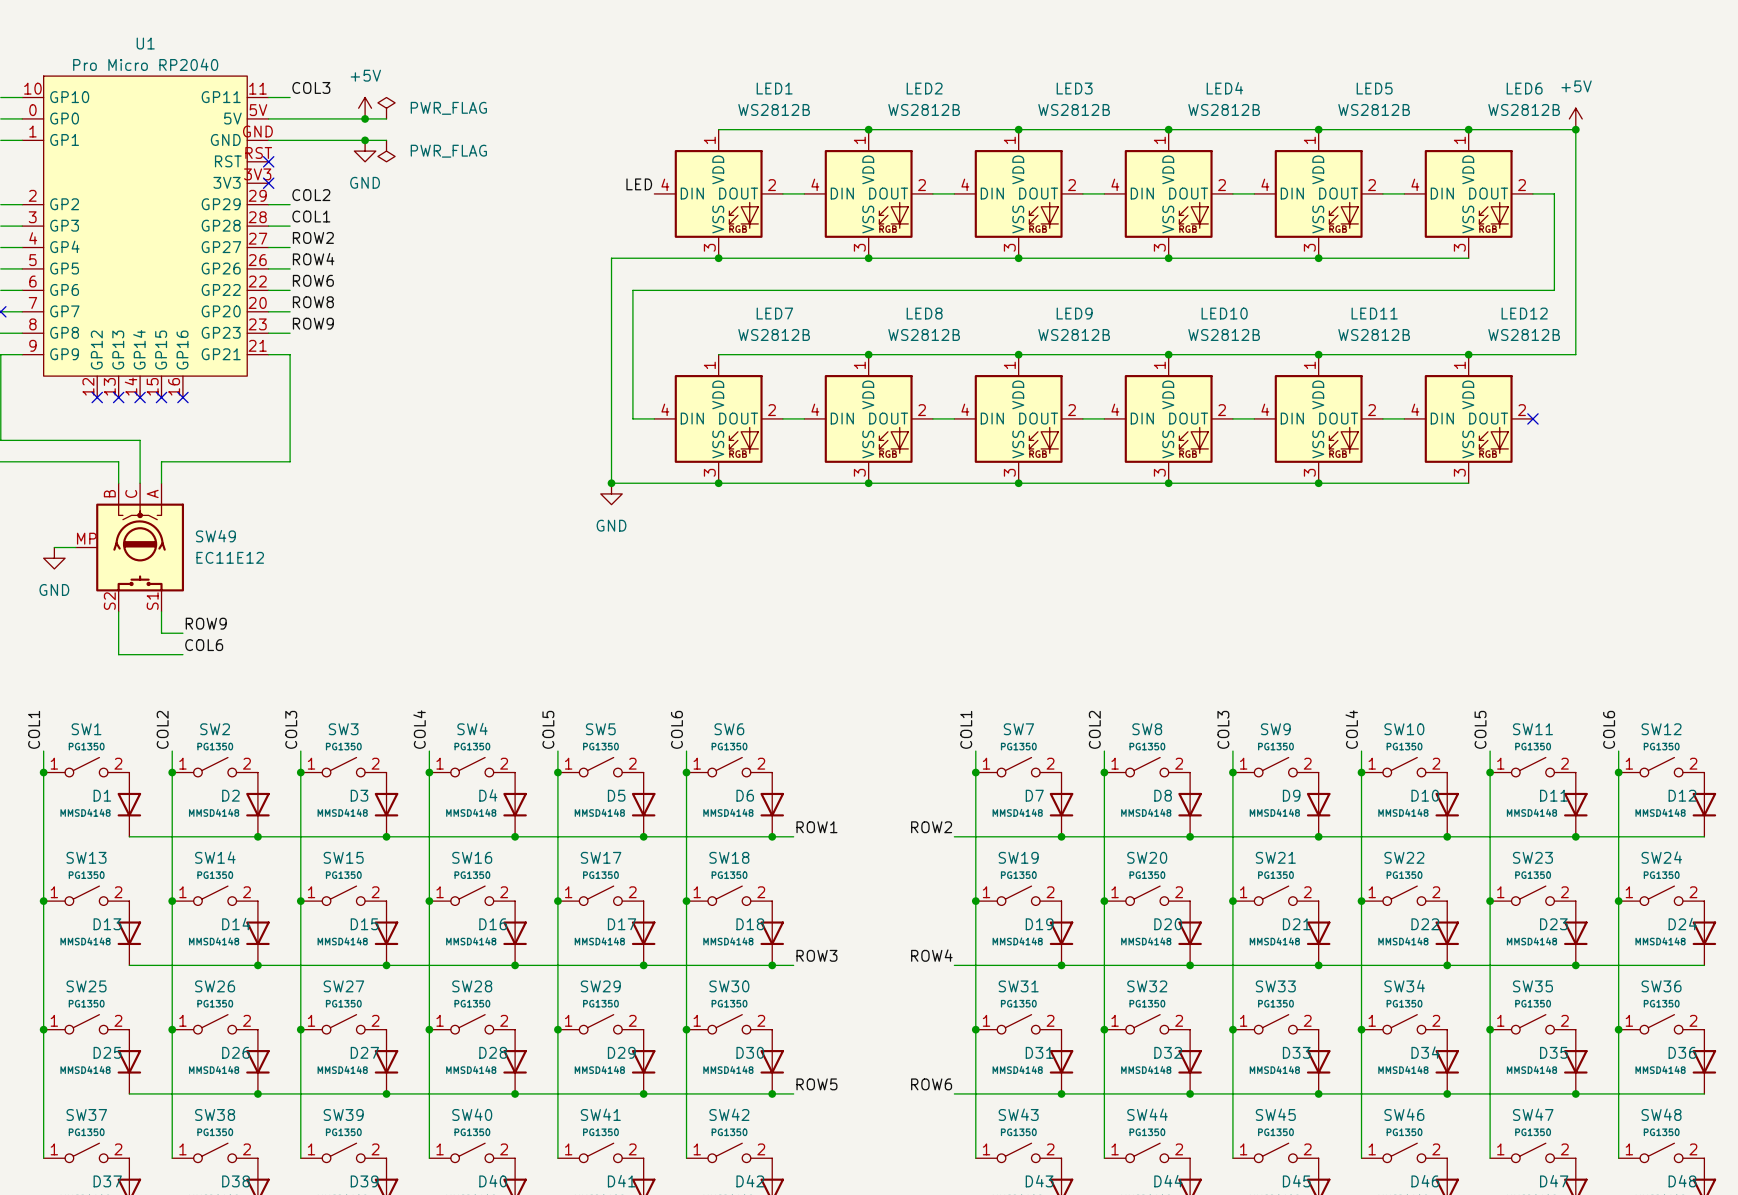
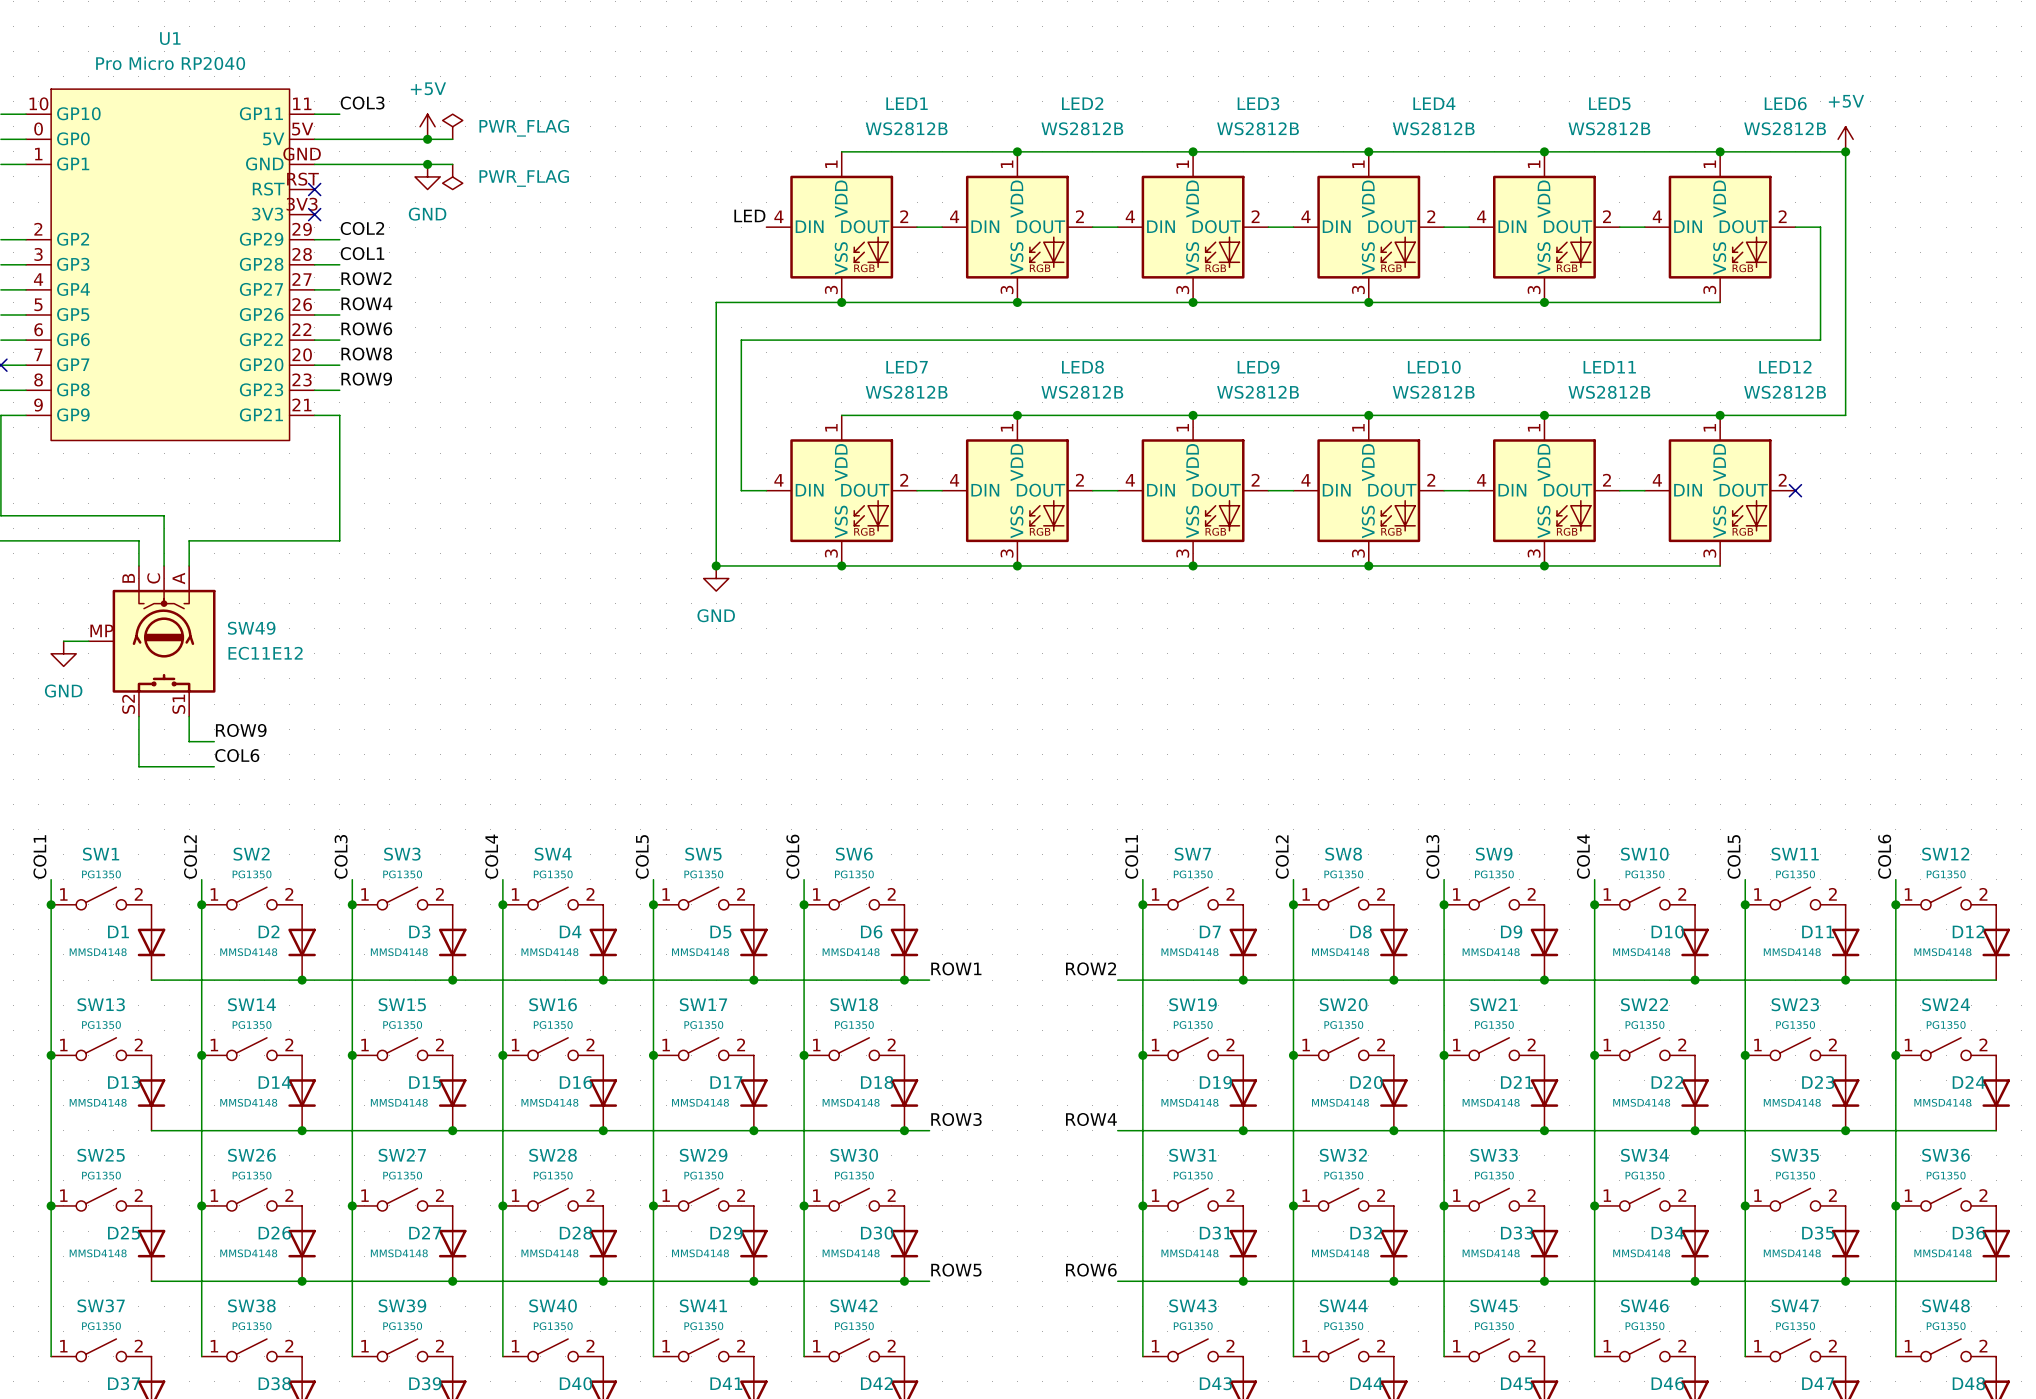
U1 symbol: [22, 76, 269, 398] -> [26, 89, 315, 441]
no-connect mark: (97, 397) -> none
no-connect mark: (118, 397) -> none
no-connect mark: (140, 397) -> none
no-connect mark: (161, 397) -> none
no-connect mark: (182, 397) -> none

